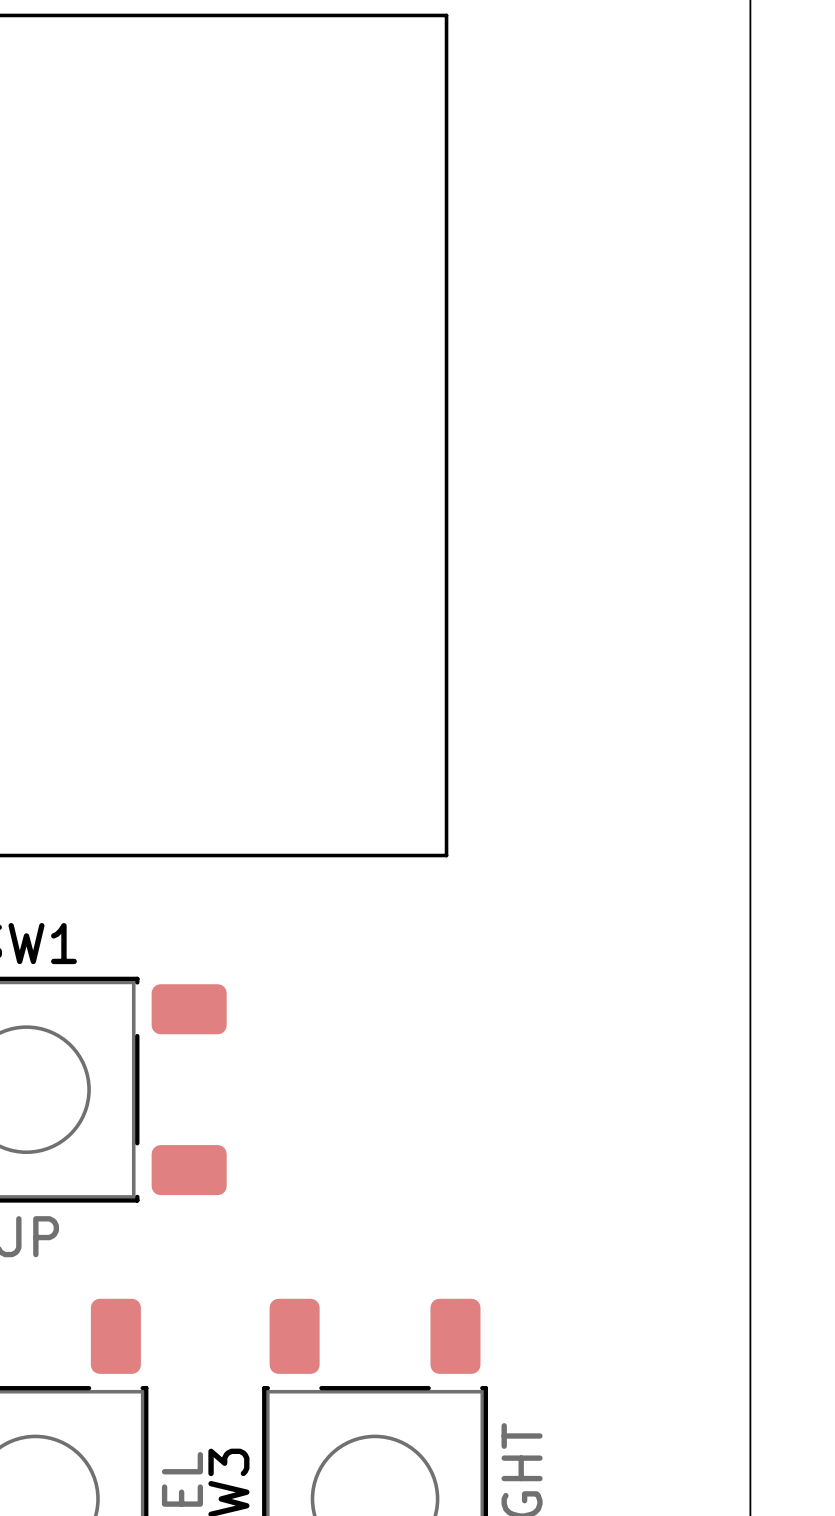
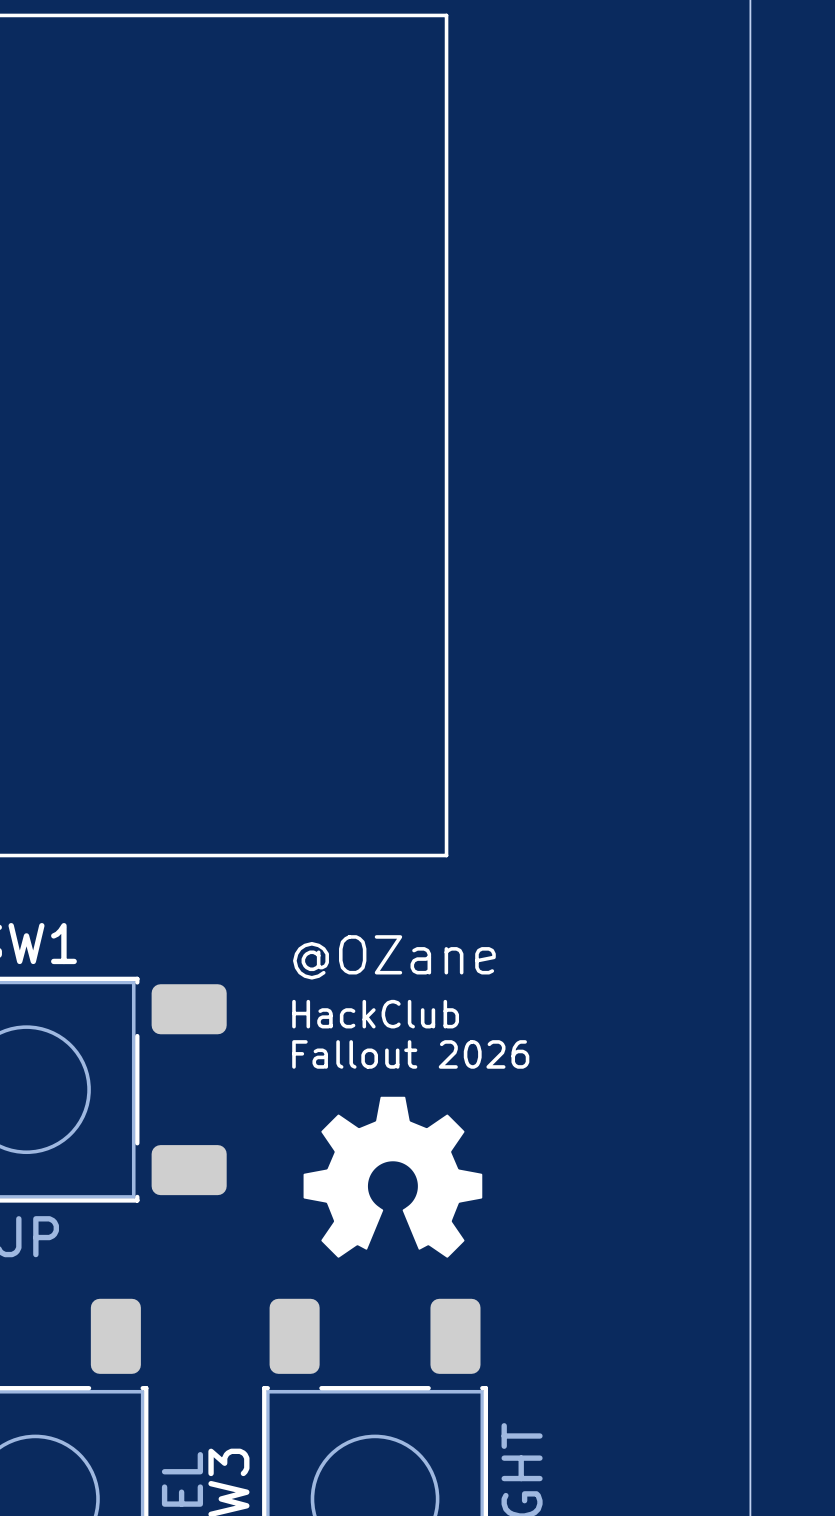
text: none -> @OZane (394, 957)
text: none -> HackClub (375, 1014)
text: none -> Fallout 2026 (410, 1054)
drawing: none -> [303, 1096, 483, 1258]

